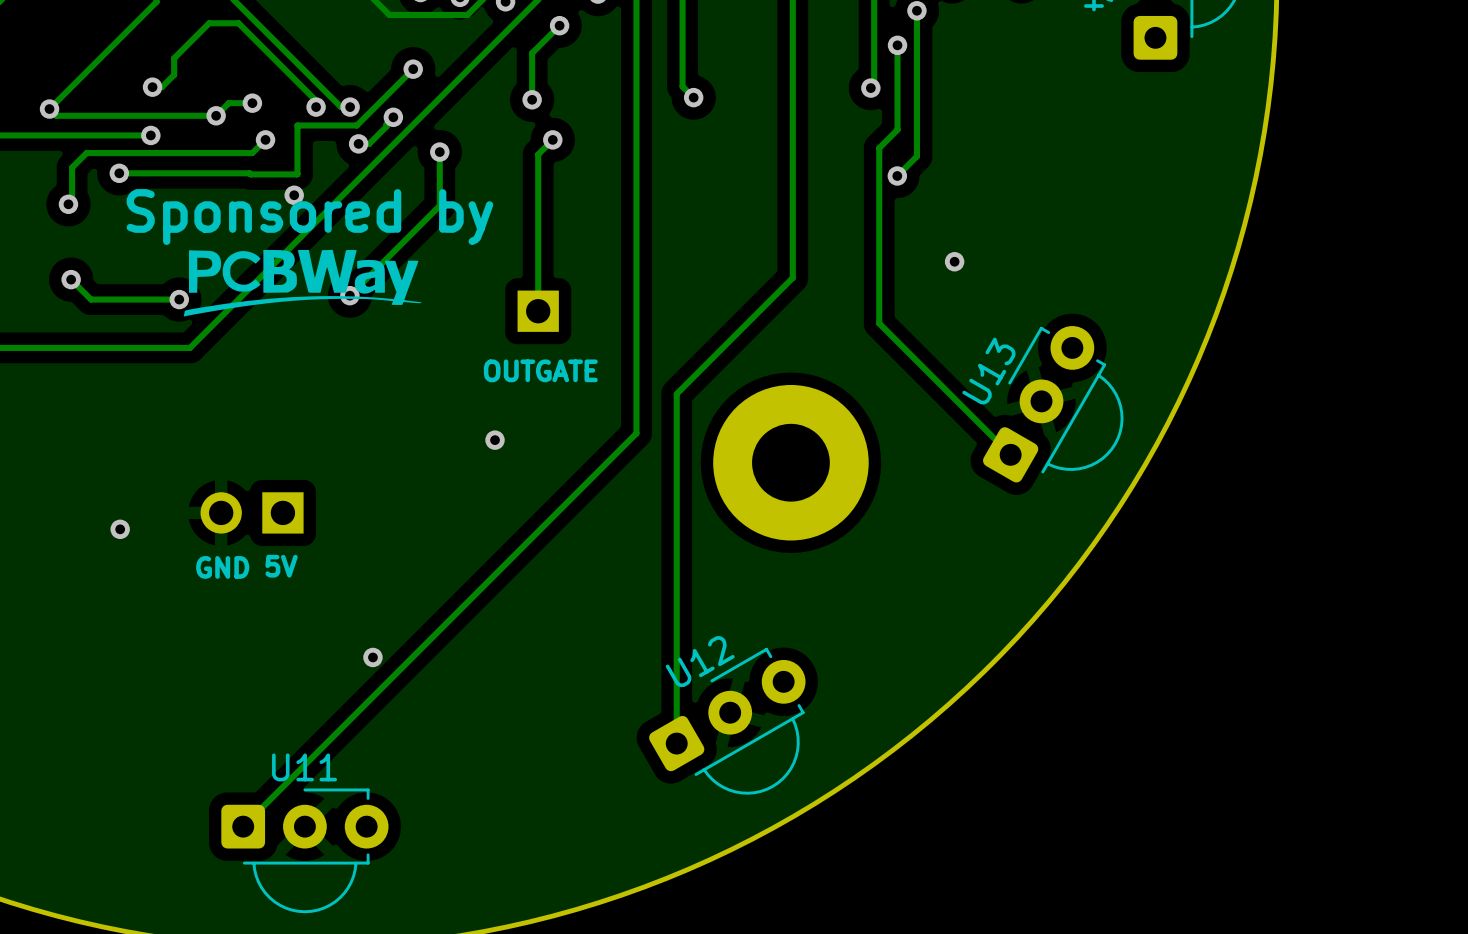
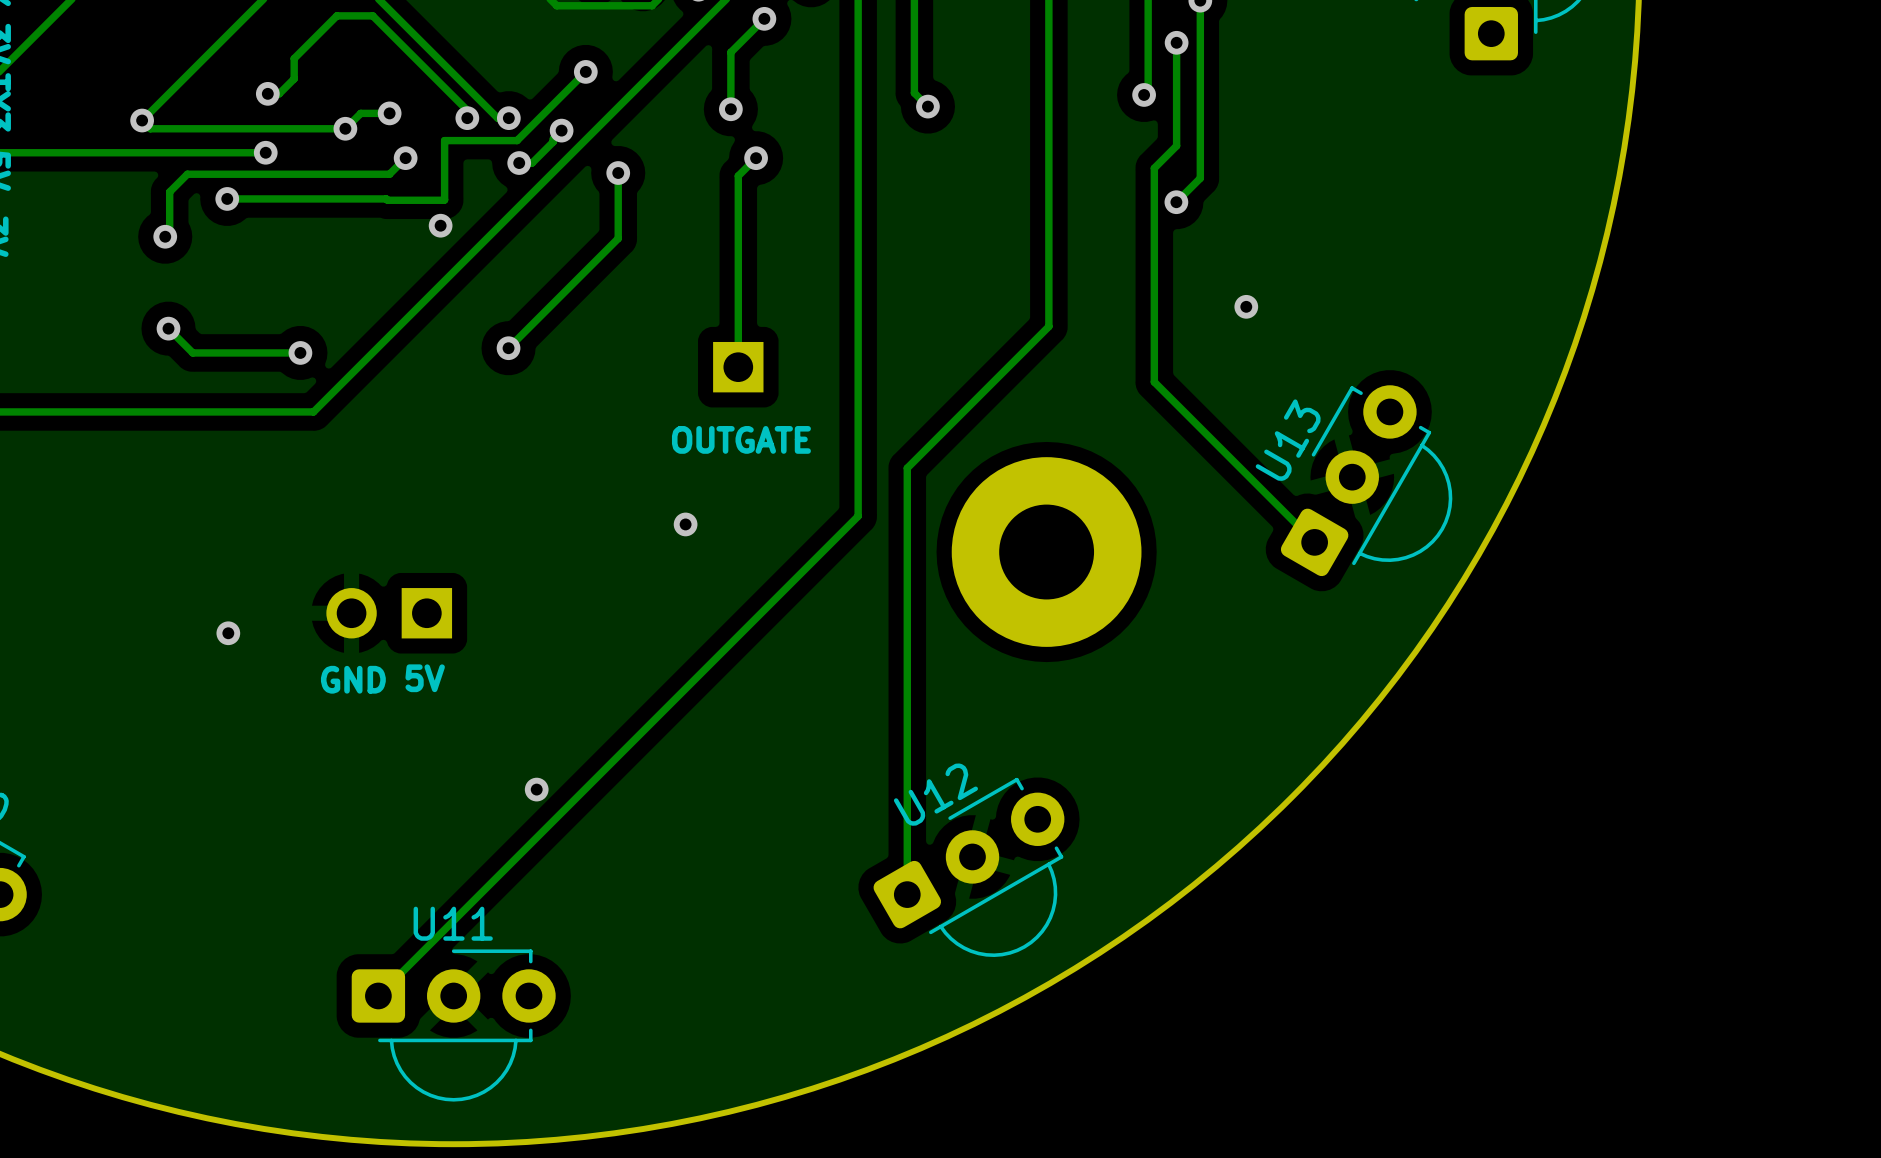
text: Sponsored by (309, 217) -> none
drawing: [183, 249, 422, 317] -> none

